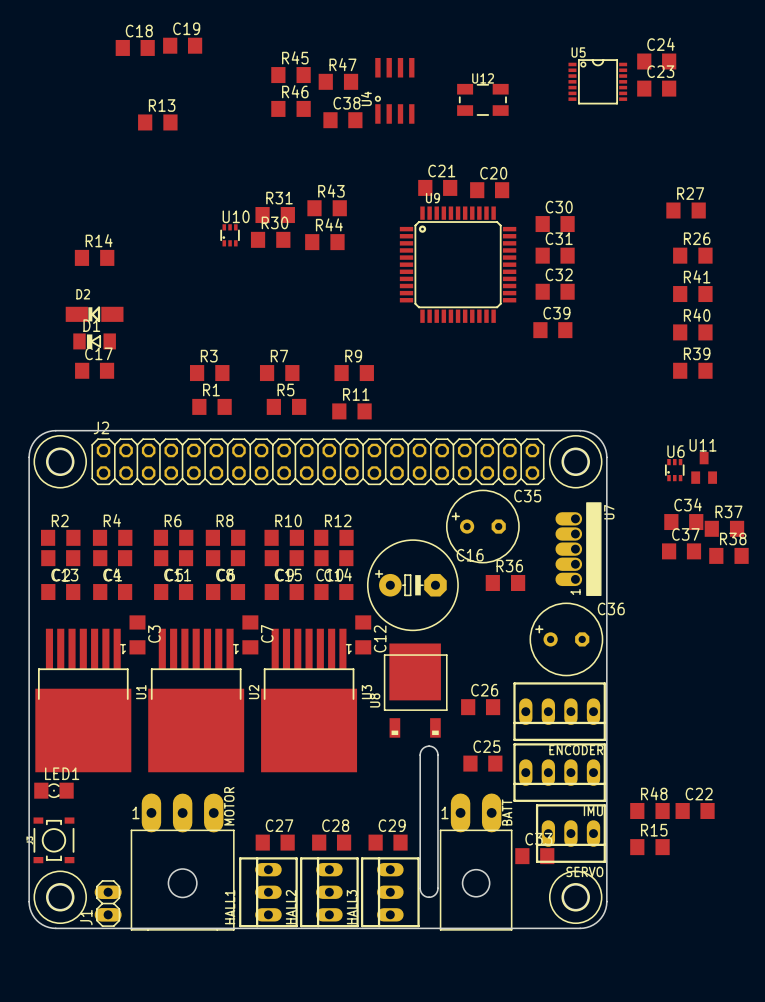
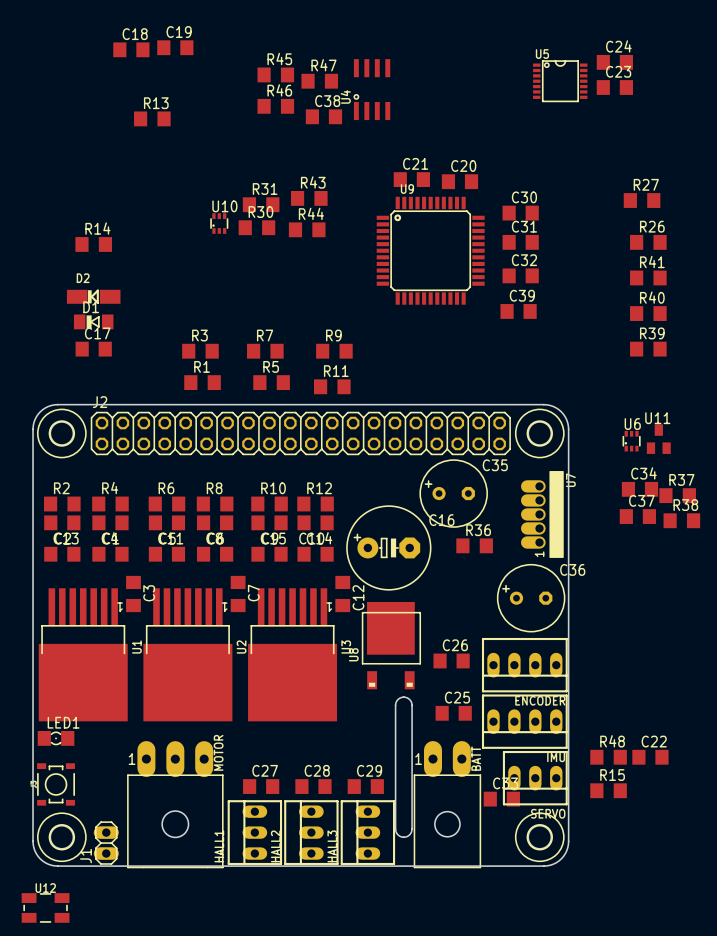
U12 position: (482, 99) -> (45, 907)

